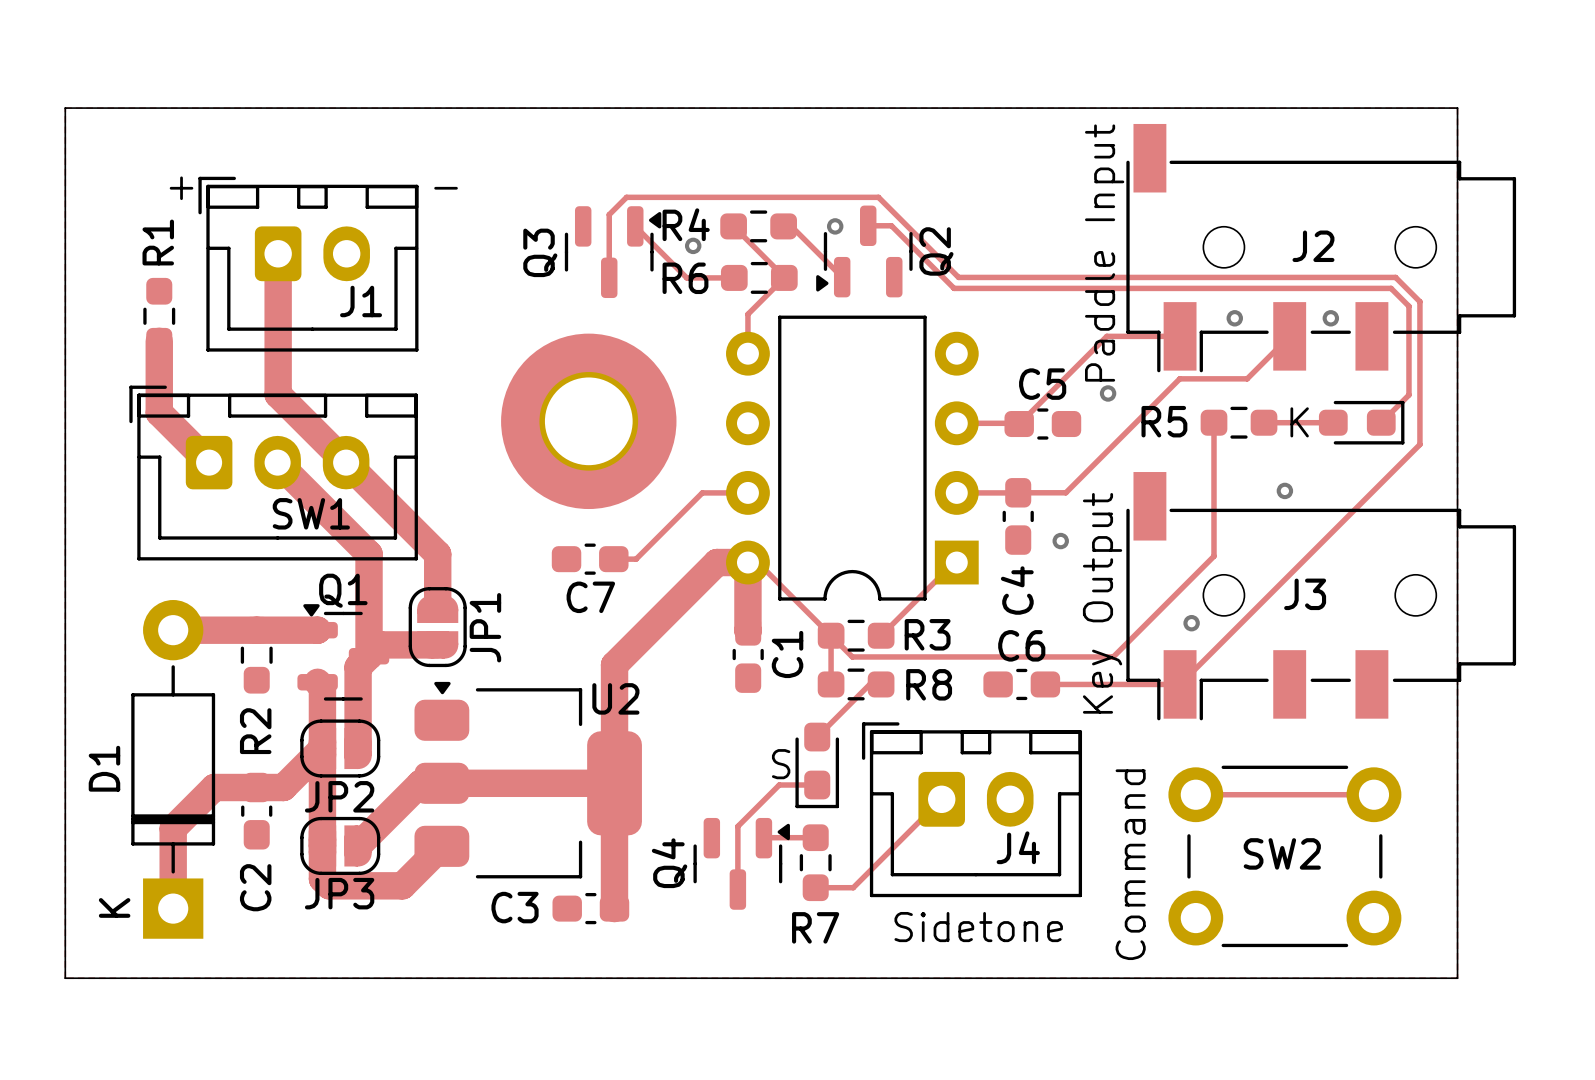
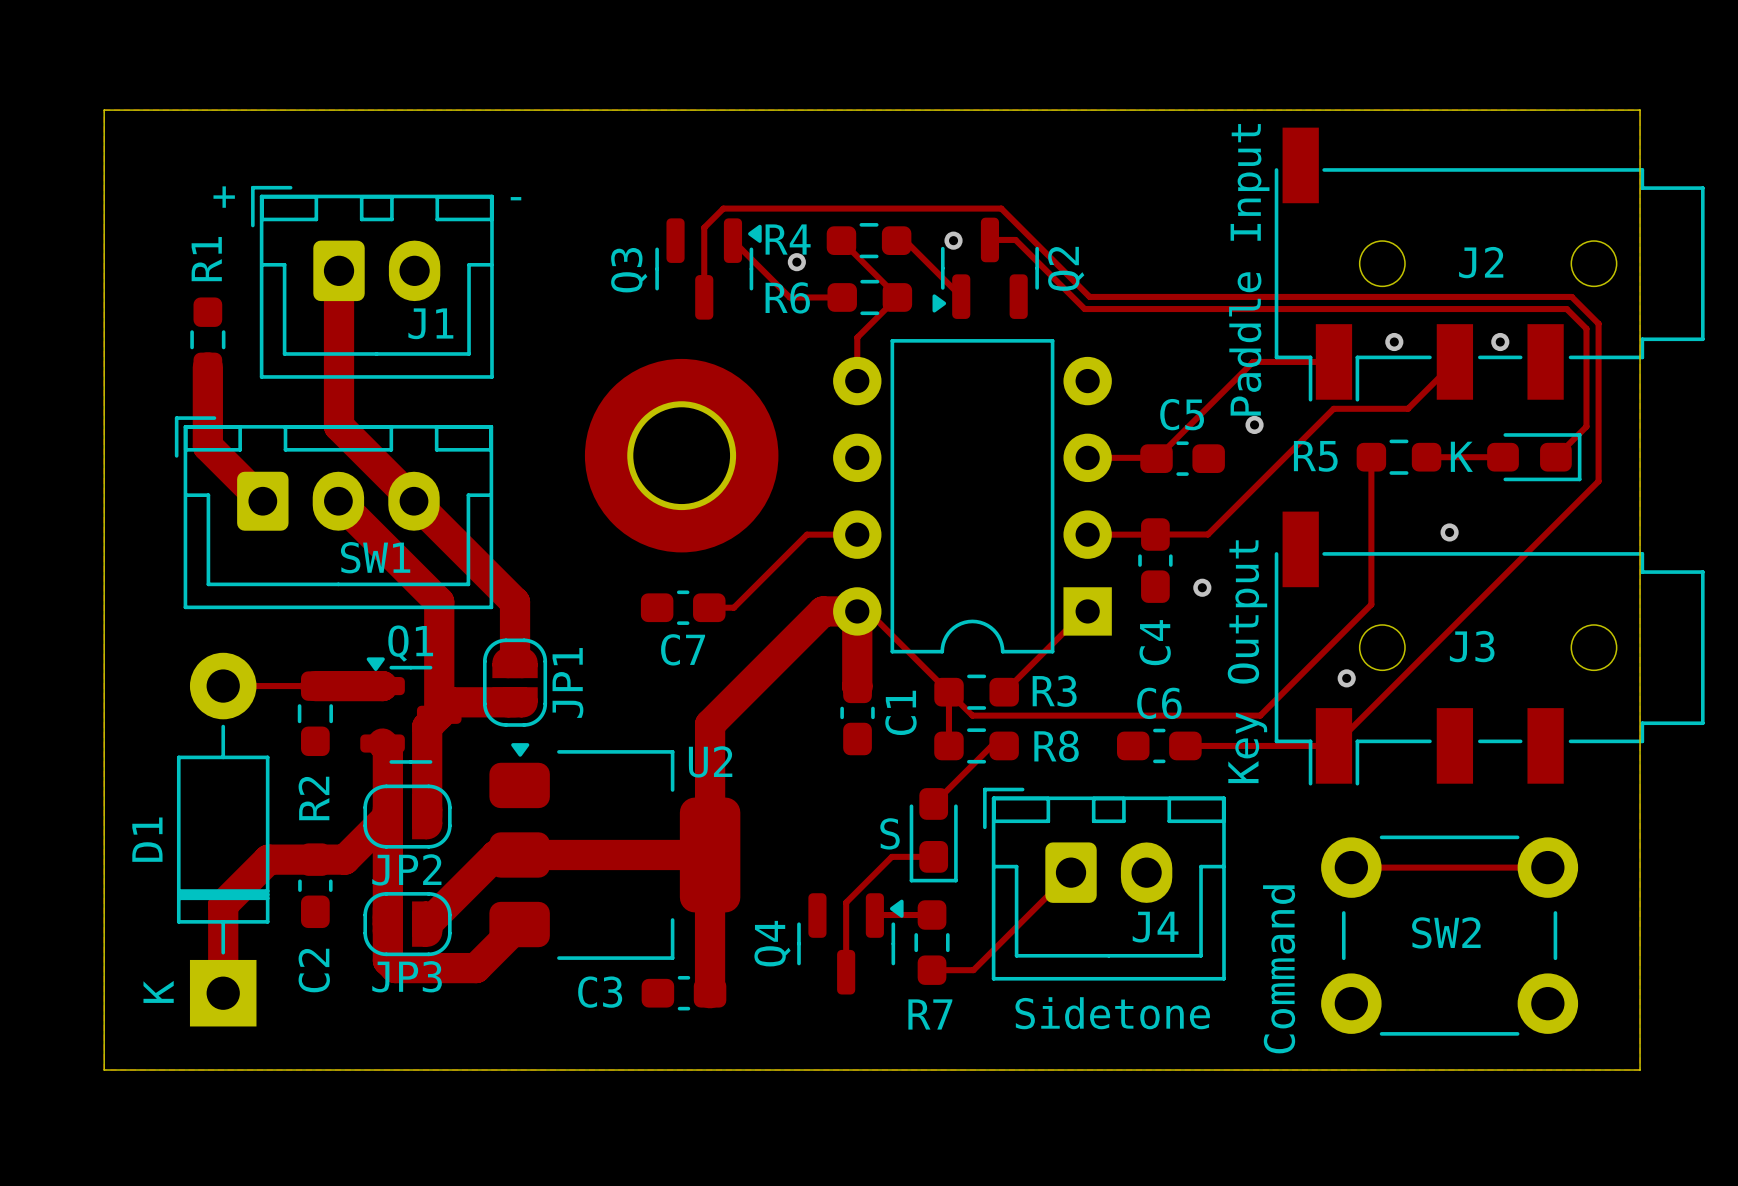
track width: thick (173, 630) (256, 630) -> thin (223, 686) (315, 686)

